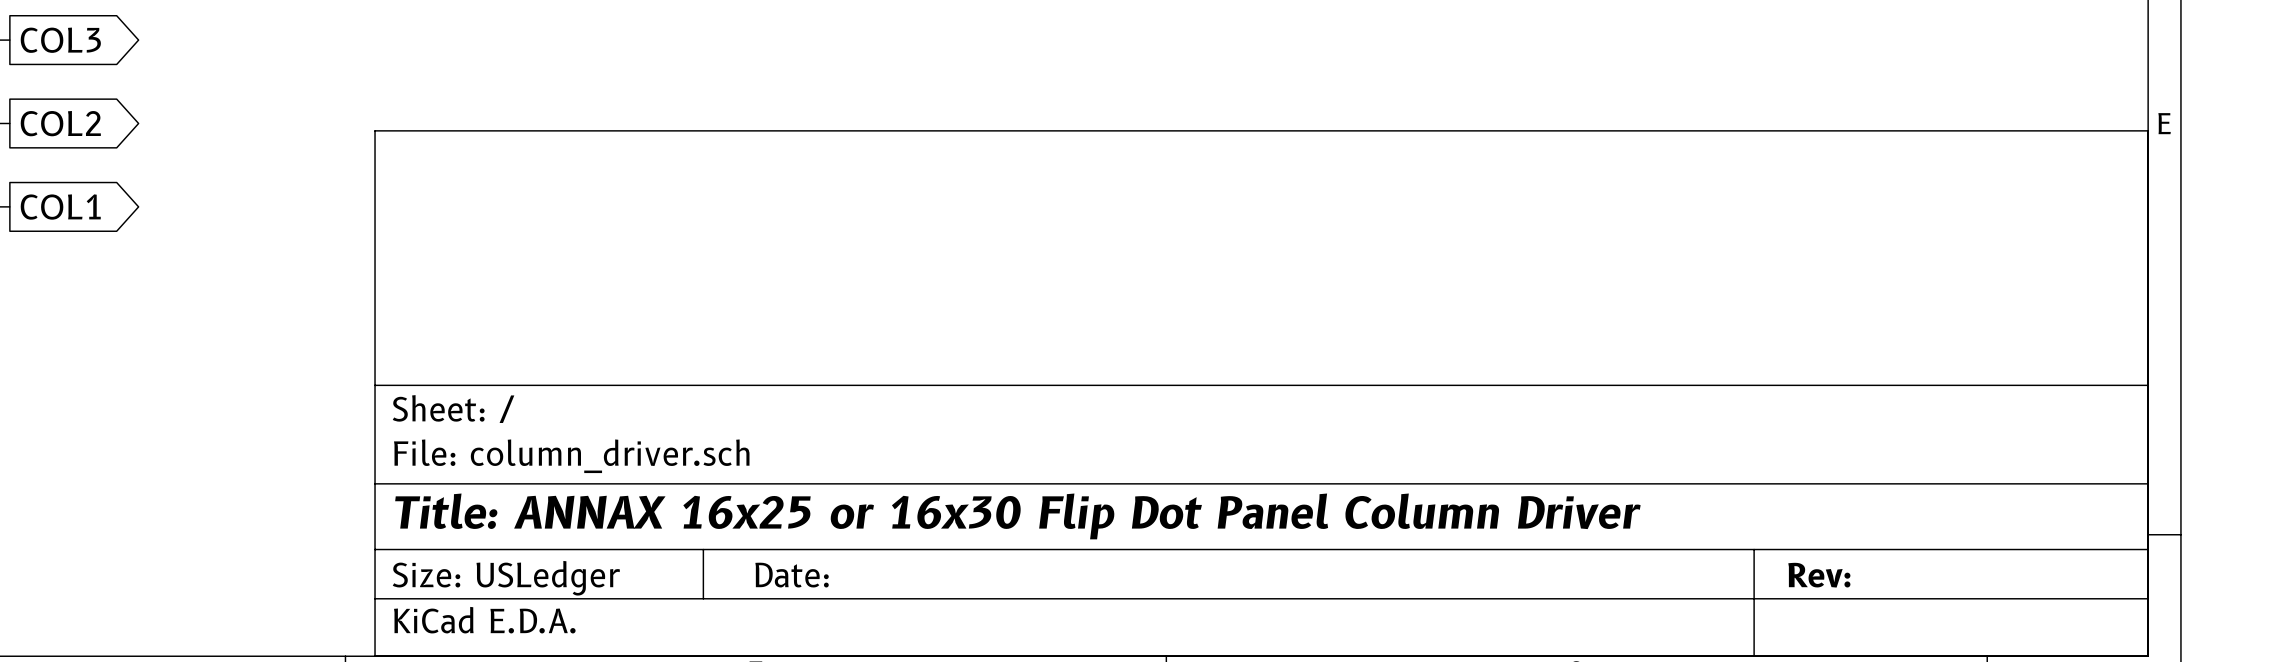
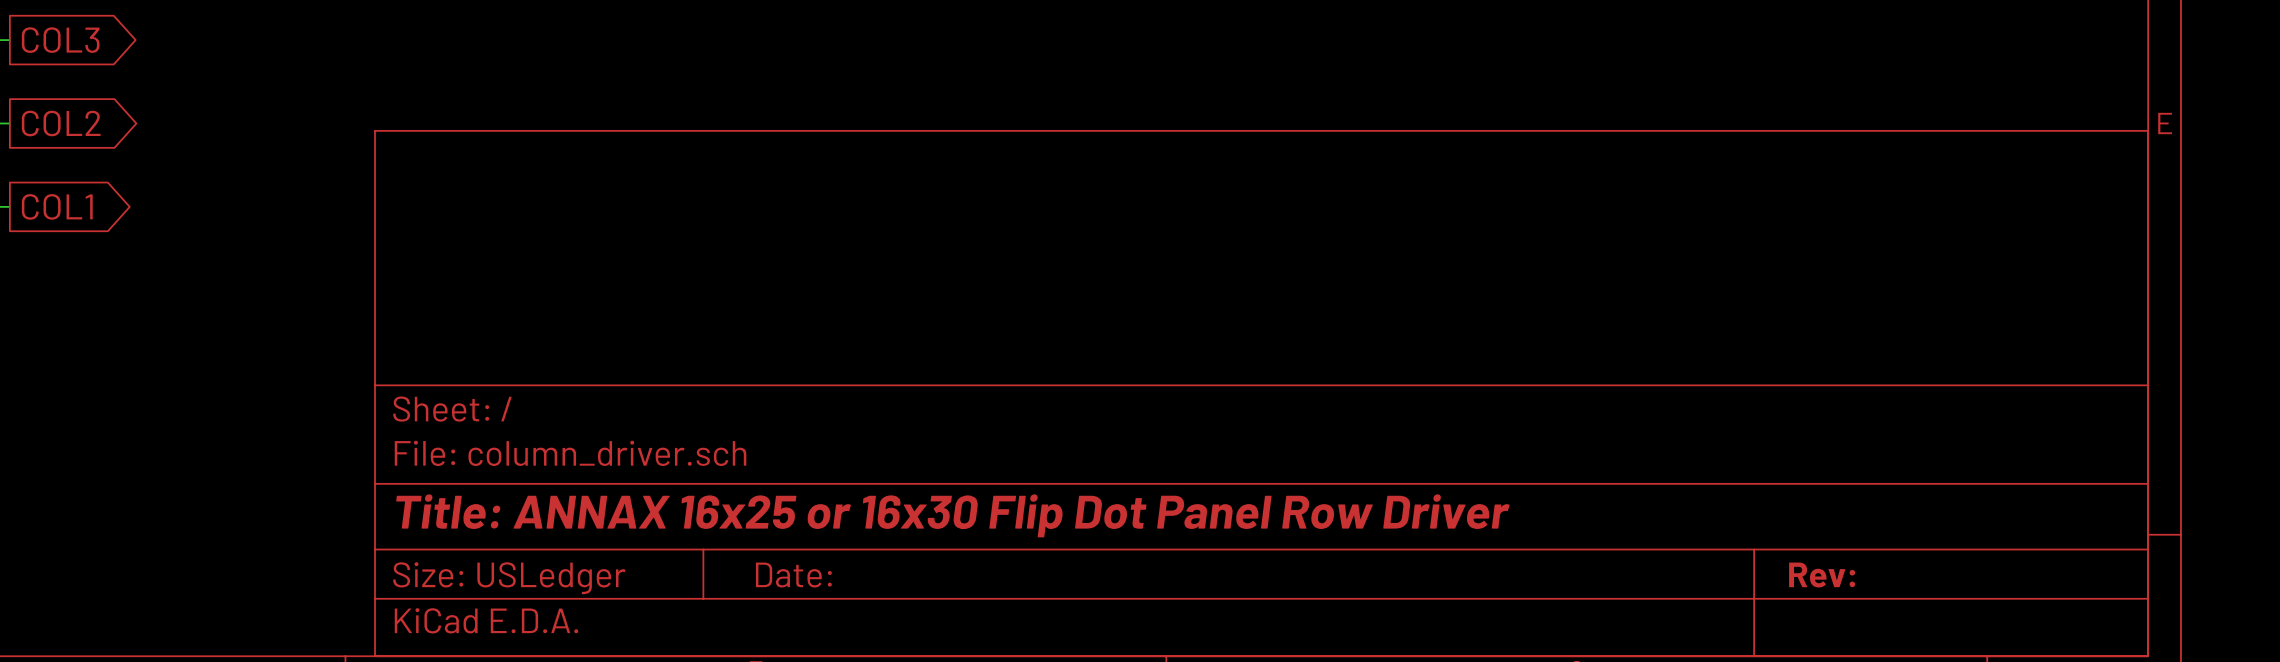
title block: Title: ANNAX 16x25 or 16x30 Flip Dot Panel Column Driver (1017, 516) -> Title: ANNAX 16x25 or 16x30 Flip Dot Panel Row Driver (952, 515)

